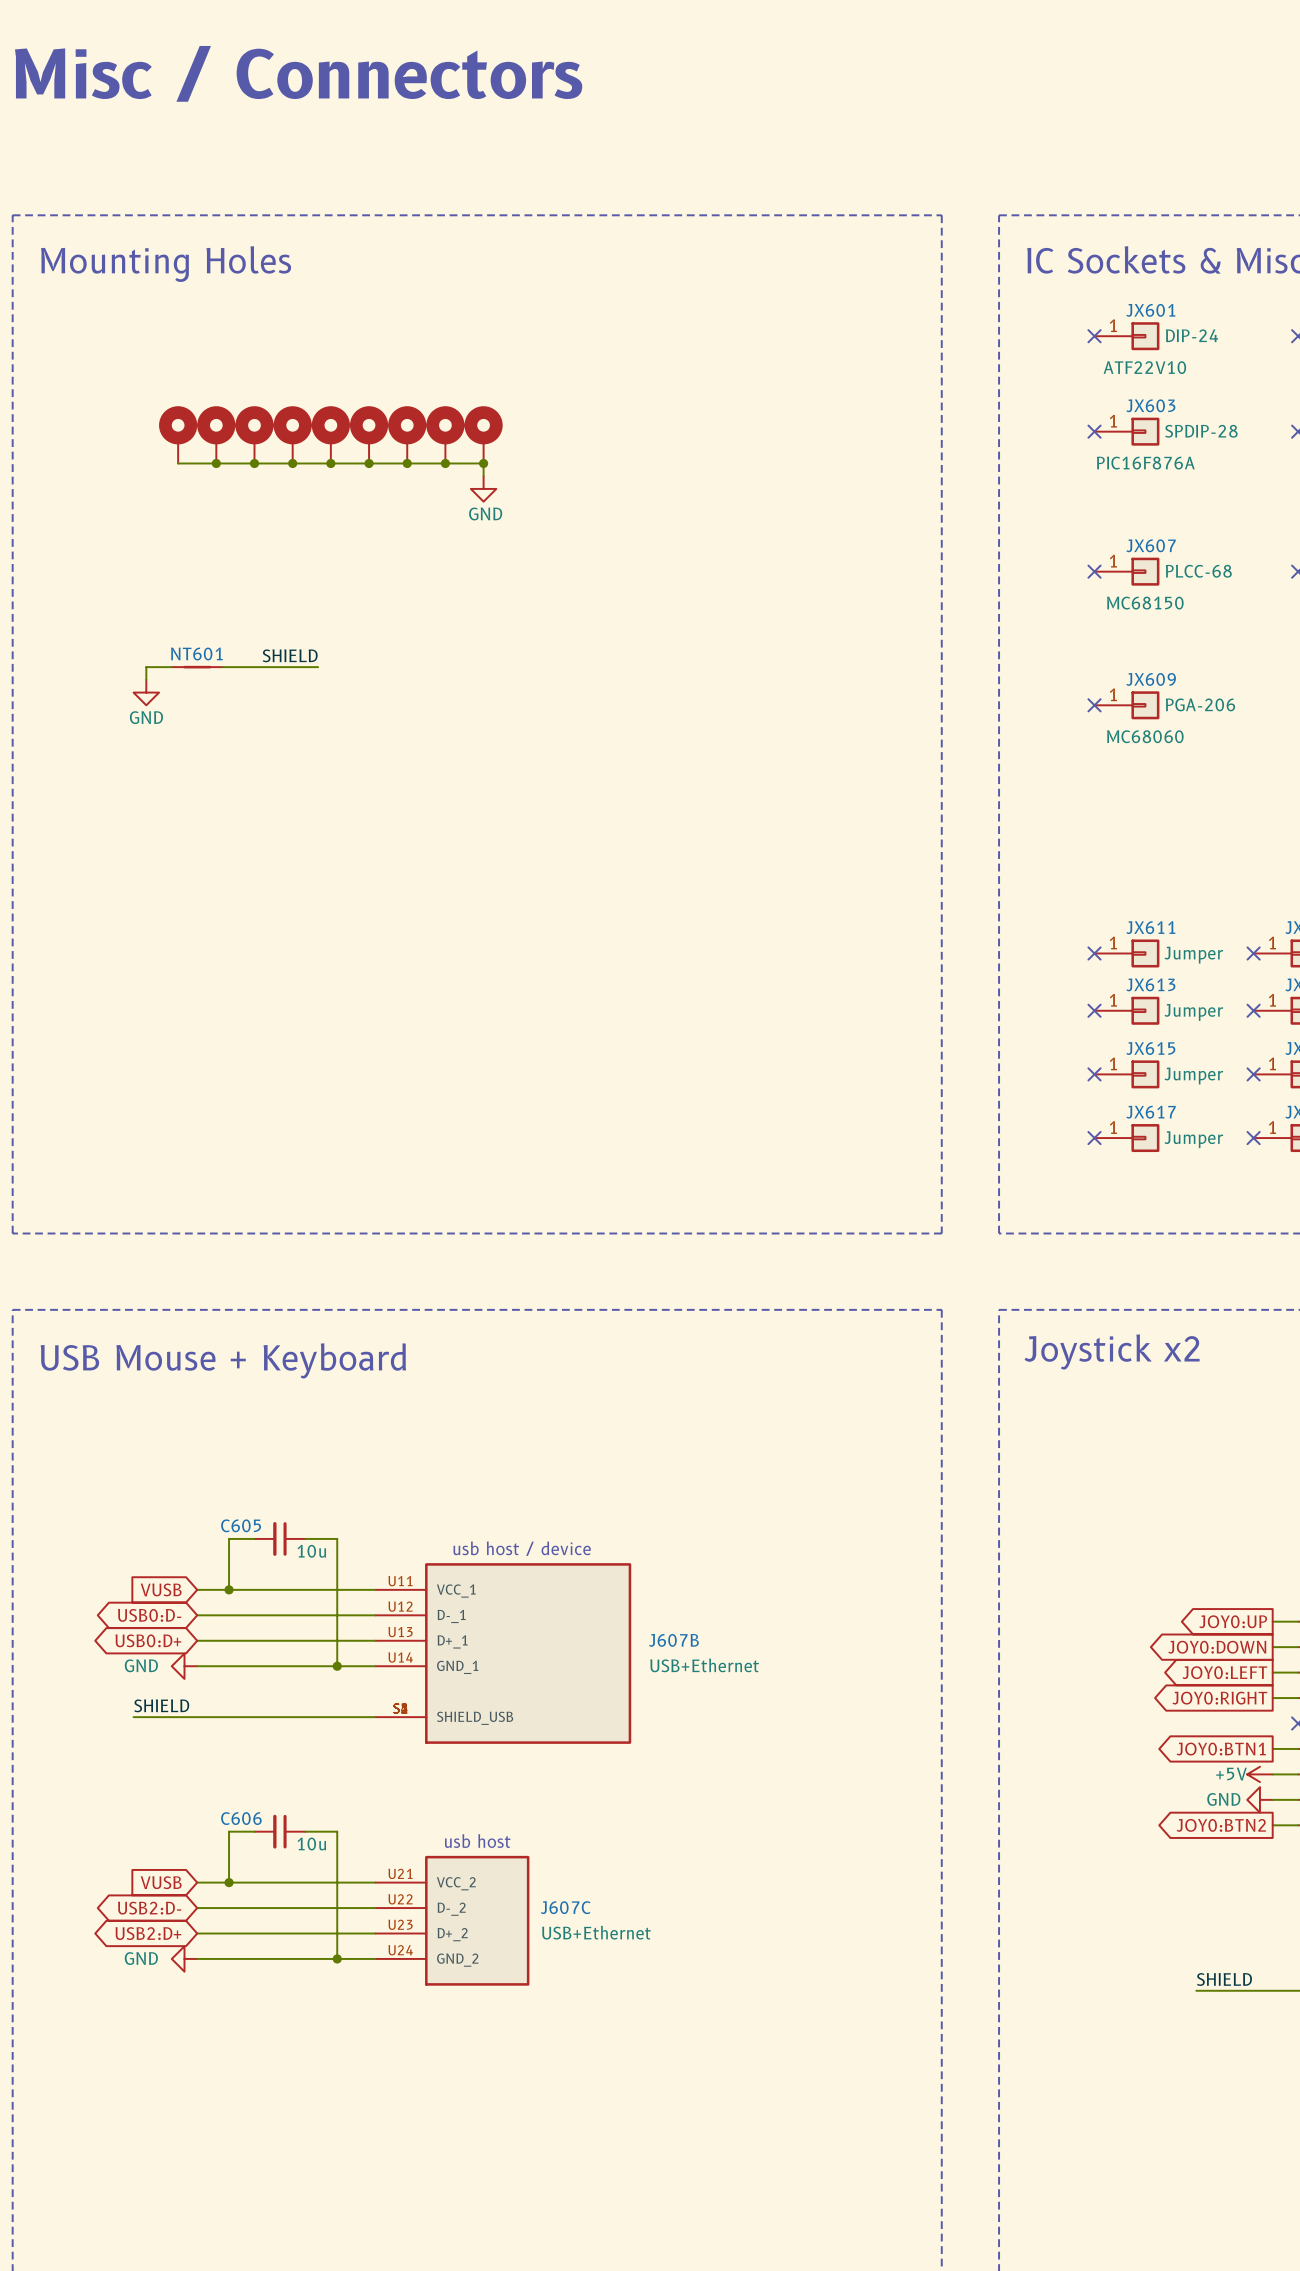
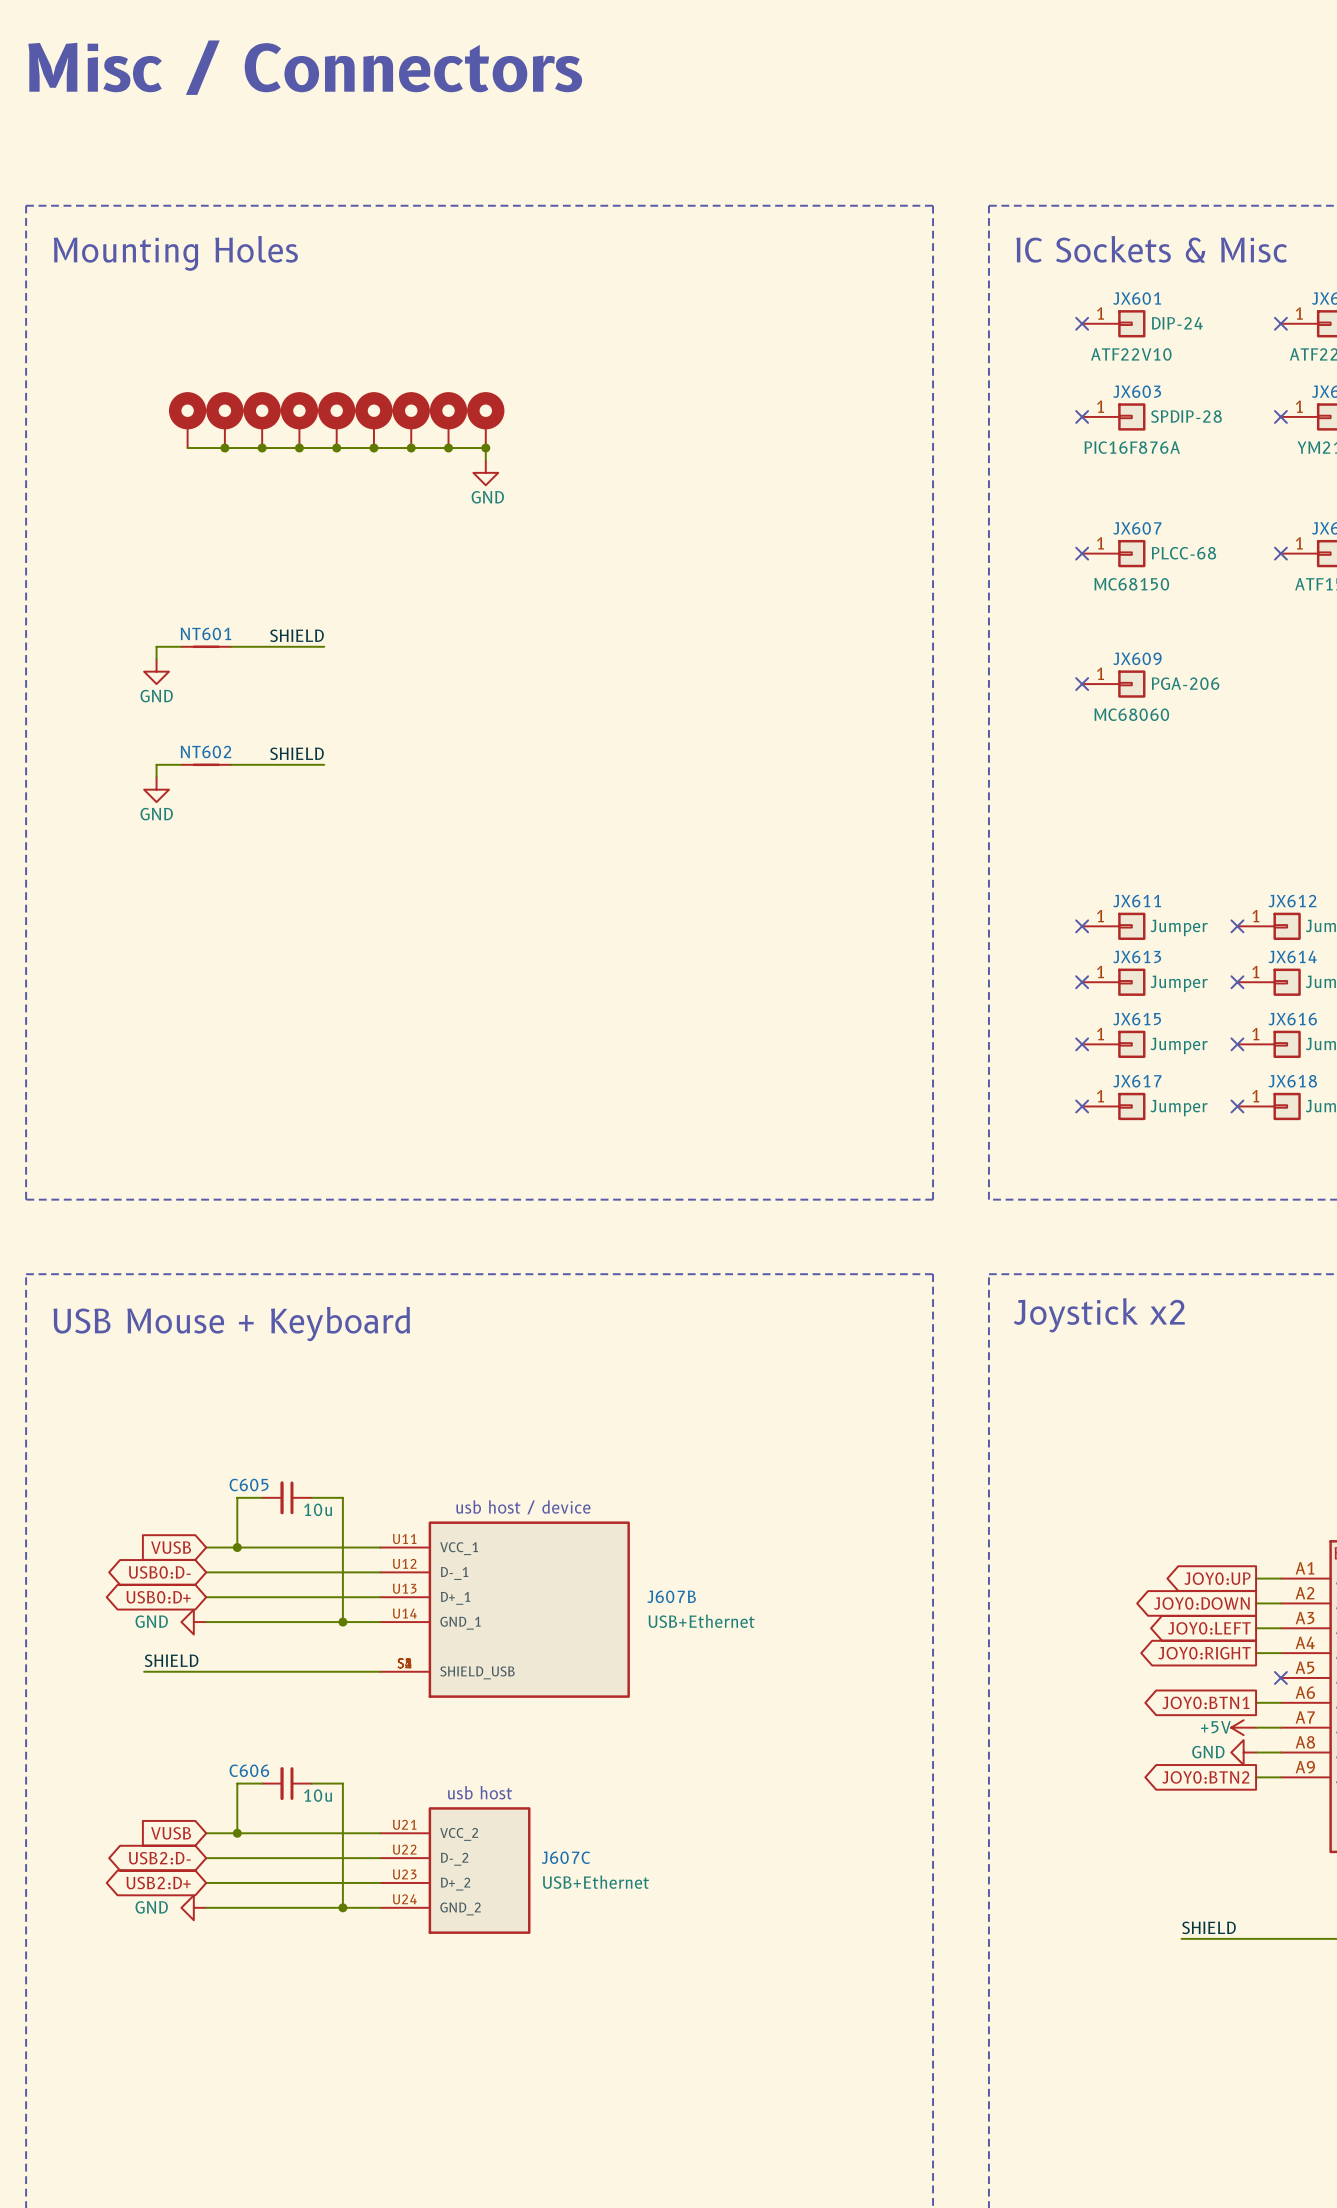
label: none -> SHIELD (296, 753)
wire: none -> (181, 764) (156, 764) (156, 777)
NT602: none -> (206, 764)
wire: none -> (231, 764) (324, 764)
power symbol: none -> GND (156, 789)

